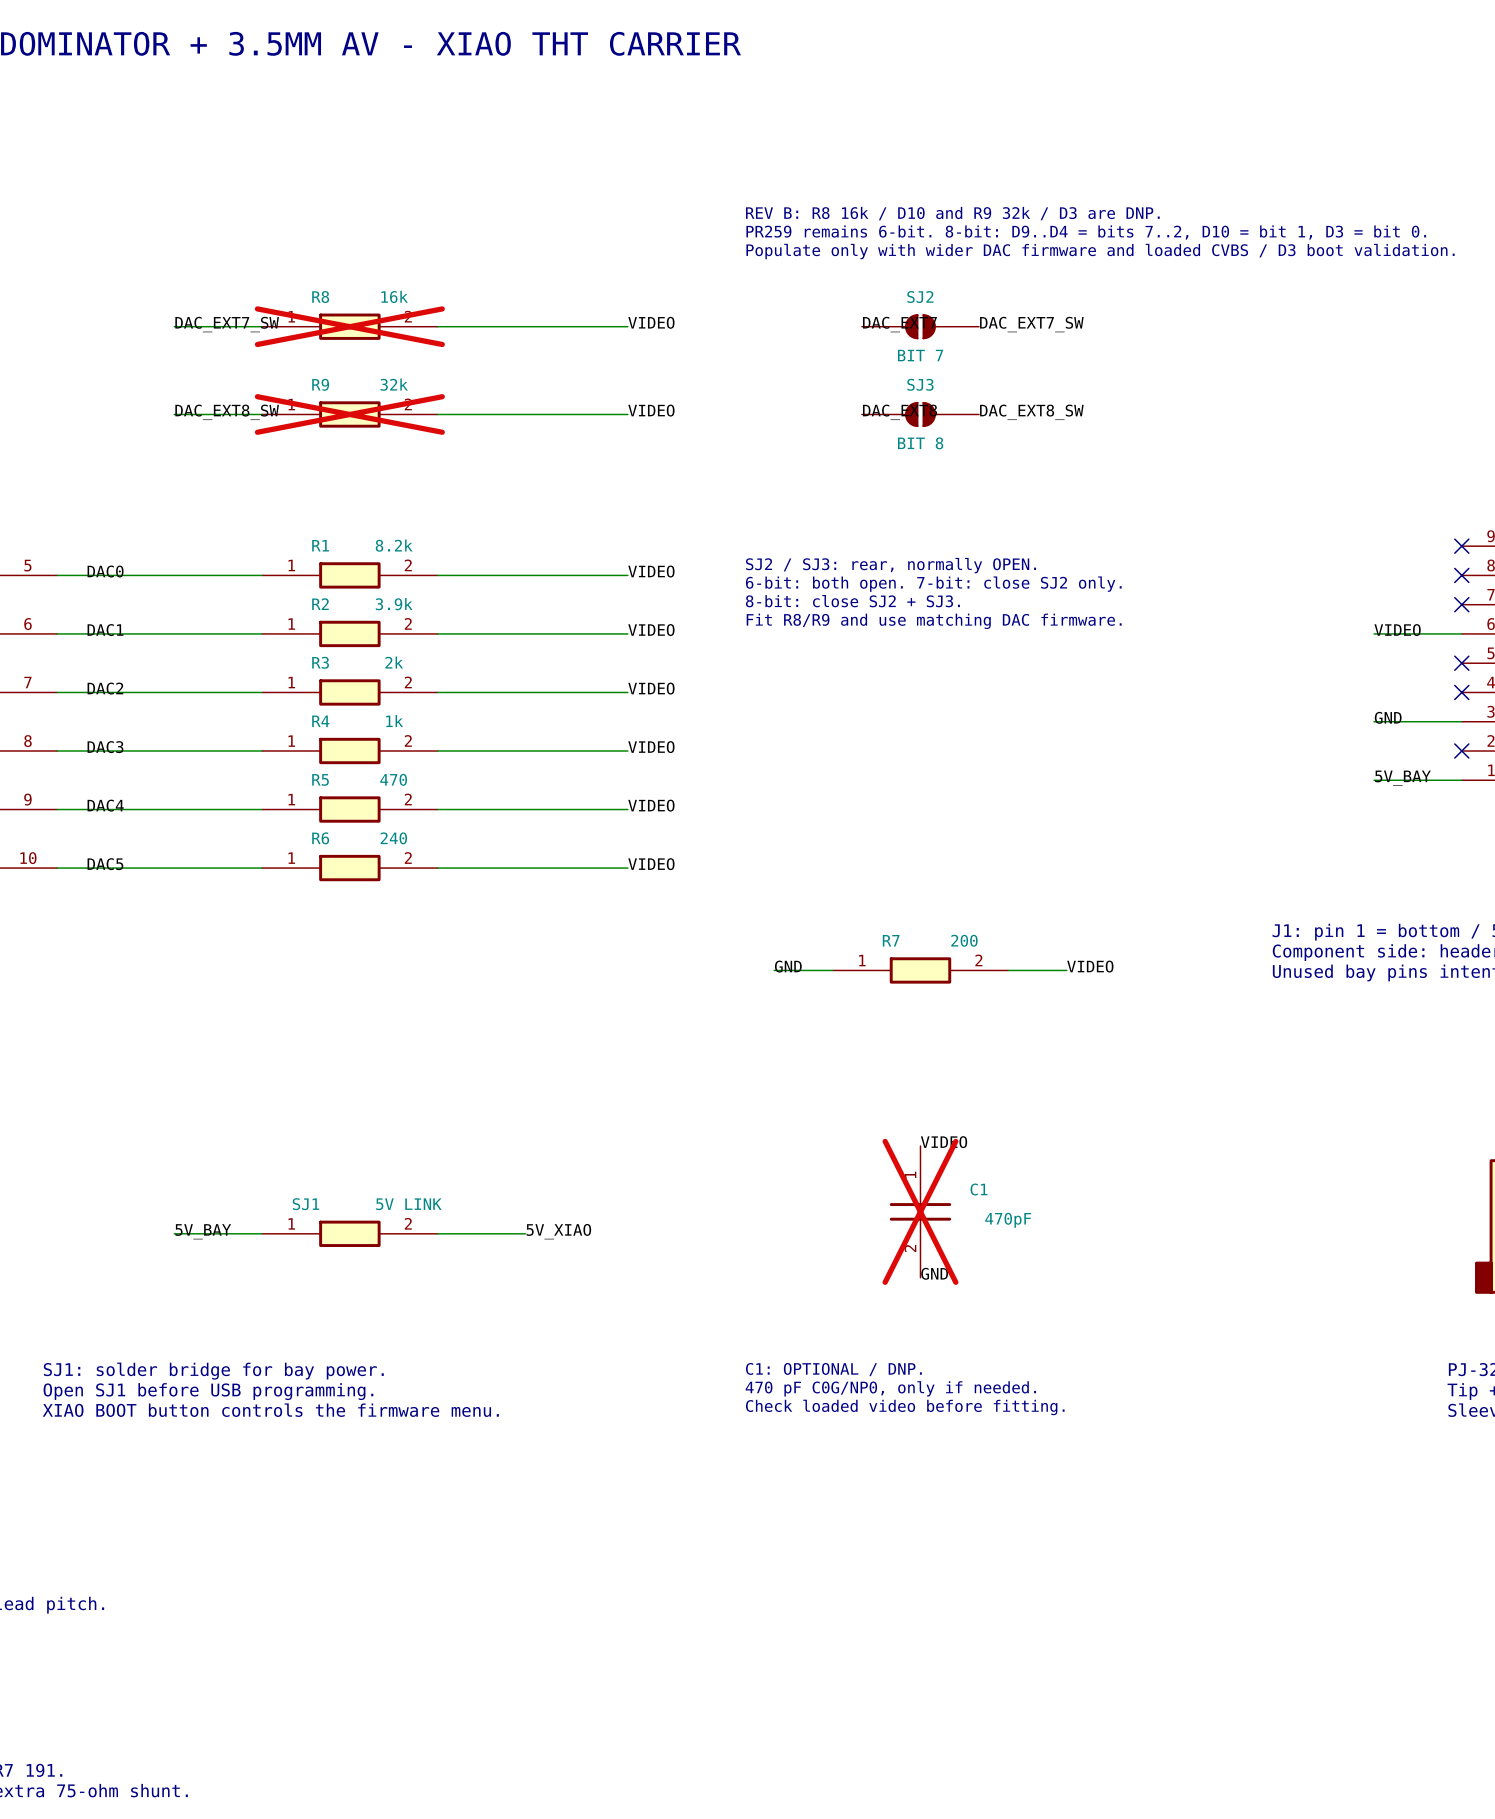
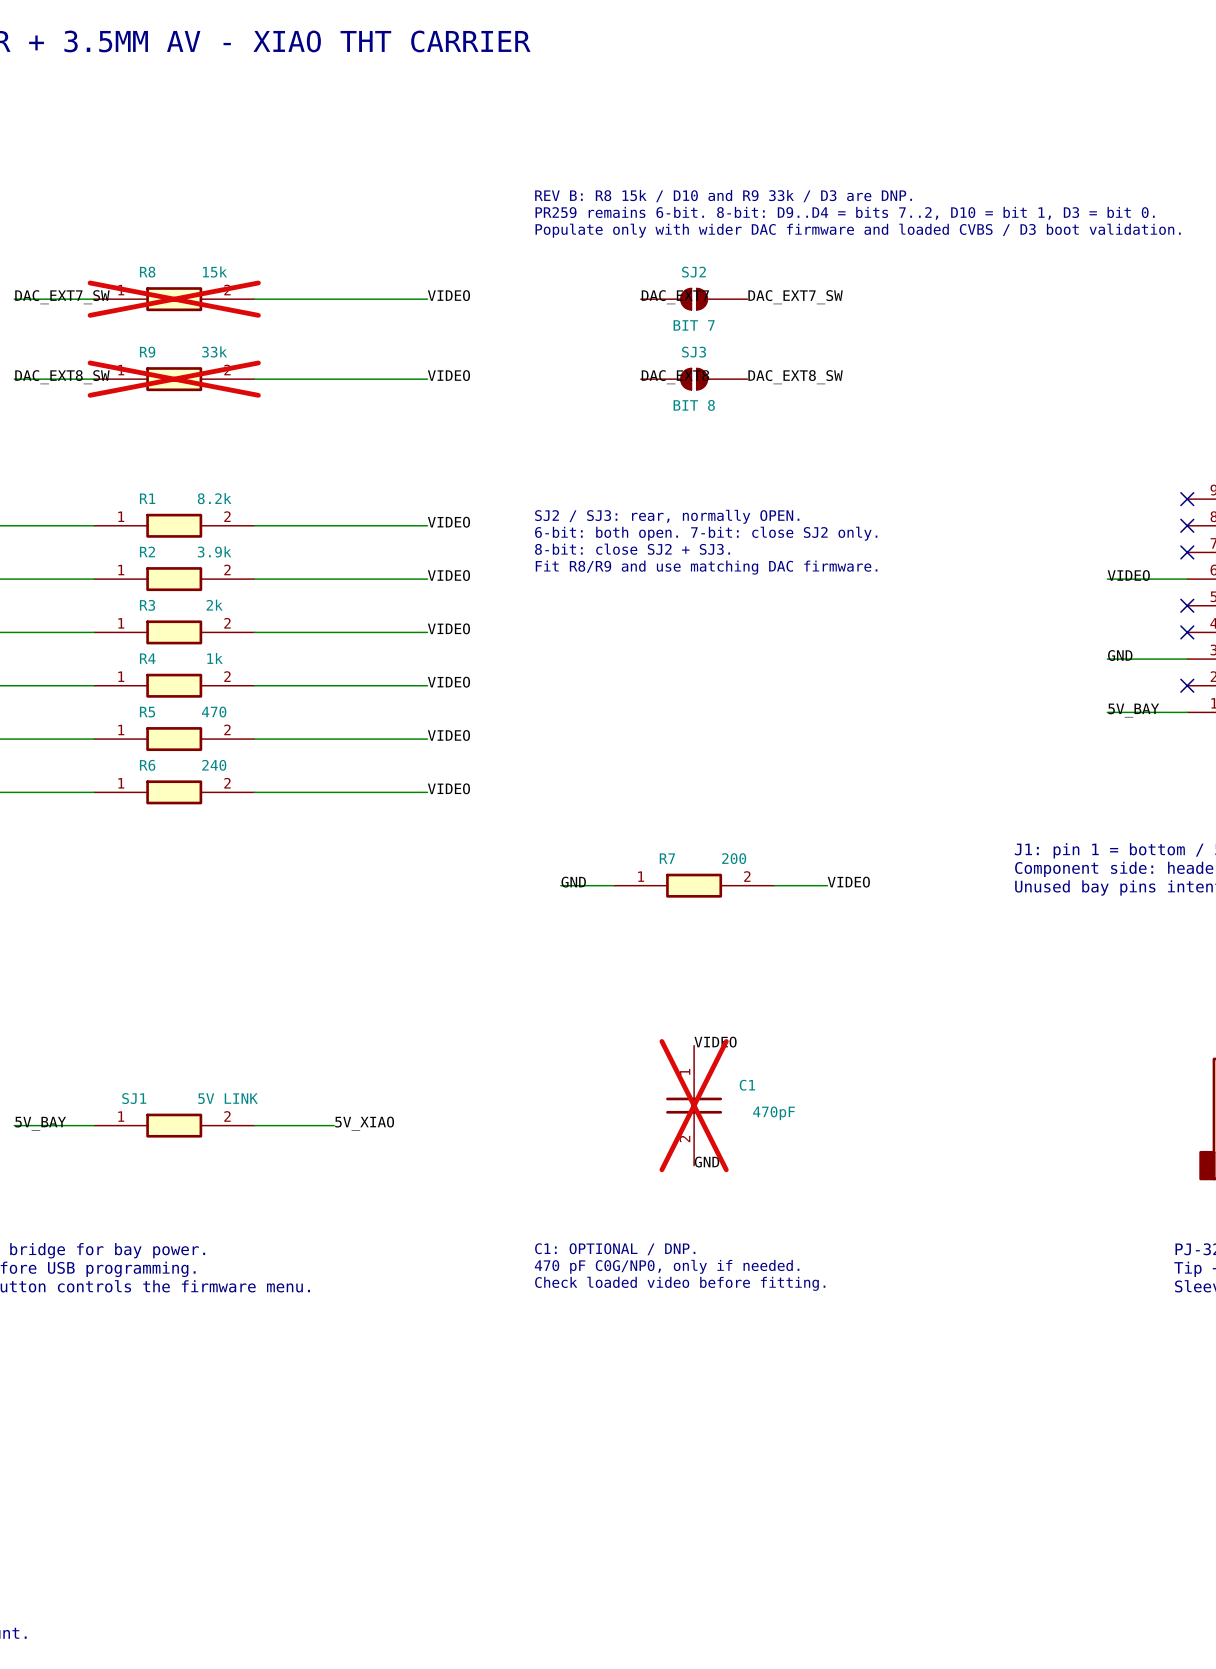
text: REV B: R8 16k / D10 and R9 32k / D3 are DNP. (952, 213) -> REV B: R8 15k / D10 and R9 33k / D3 are DNP. (723, 196)
R8 value: 16k (394, 296) -> 15k (214, 272)
R9 value: 32k (394, 384) -> 33k (214, 351)

